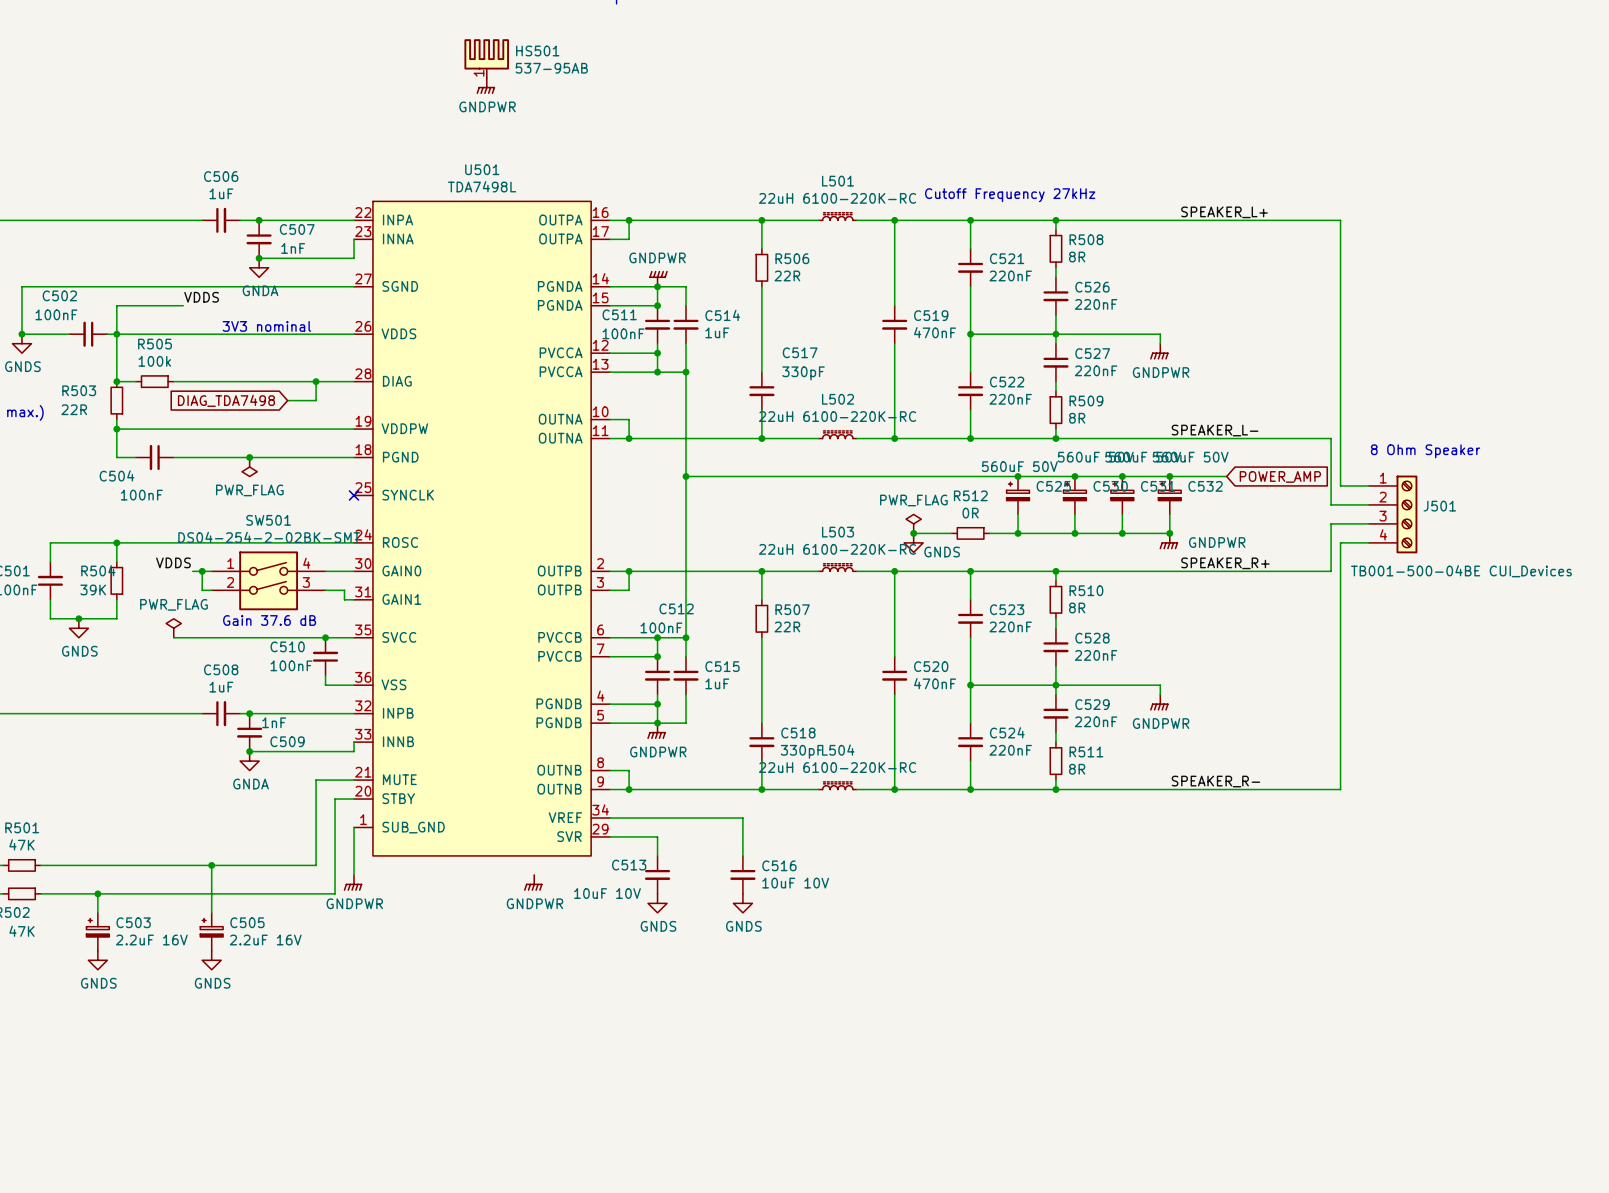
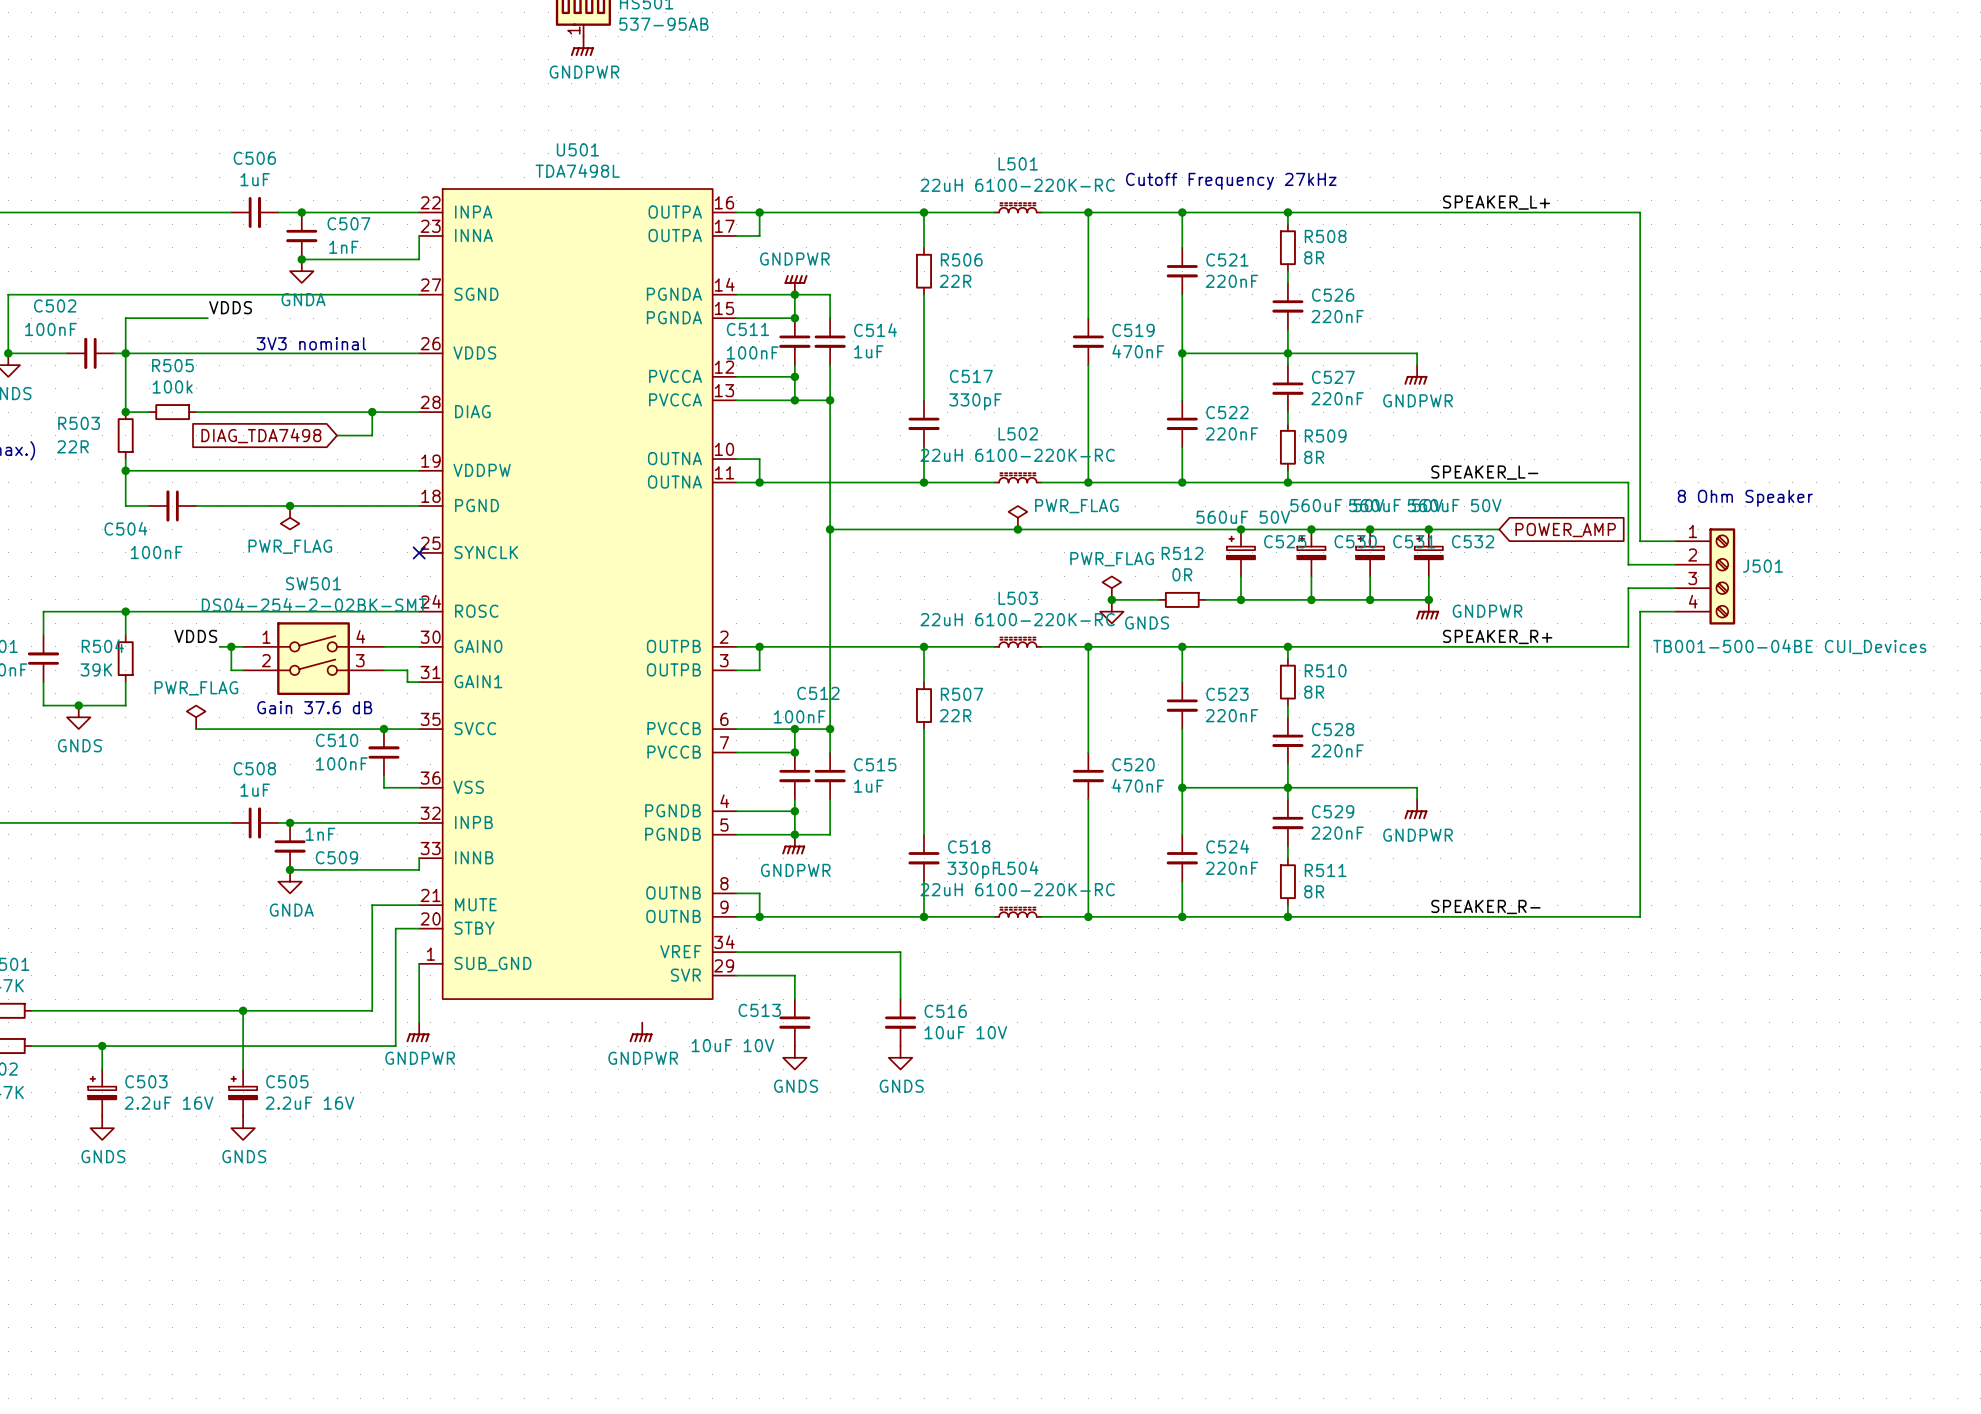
power symbol: none -> PWR_FLAG (1017, 517)
junction: none -> (1017, 529)

